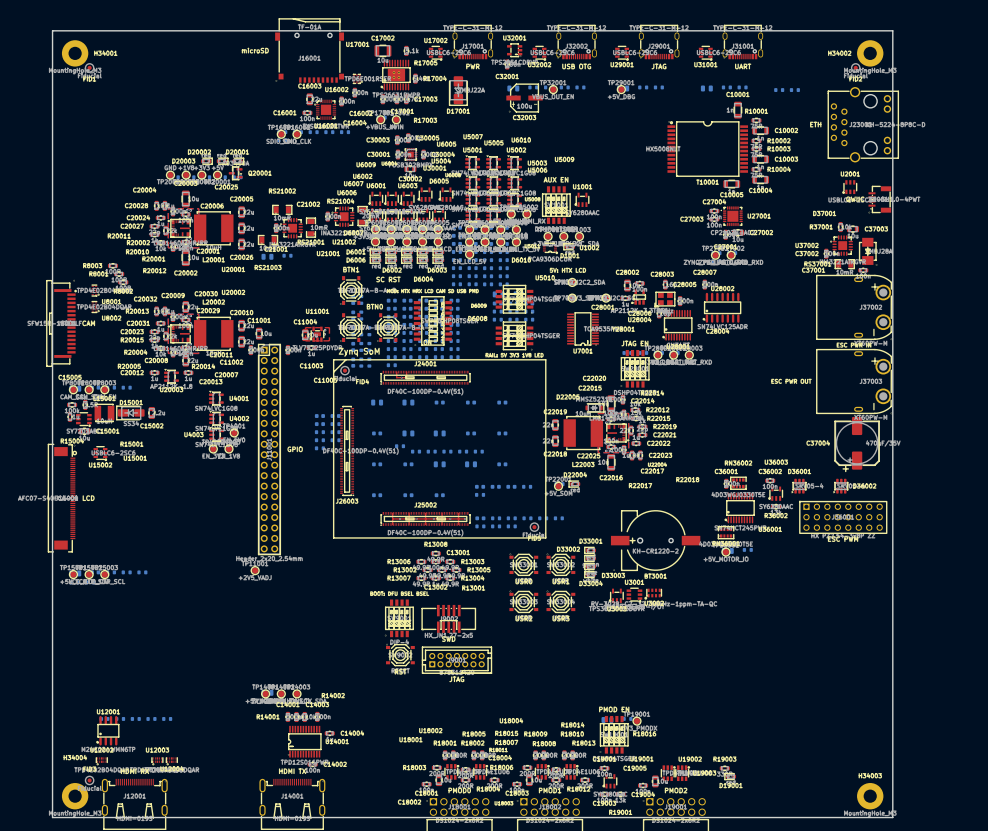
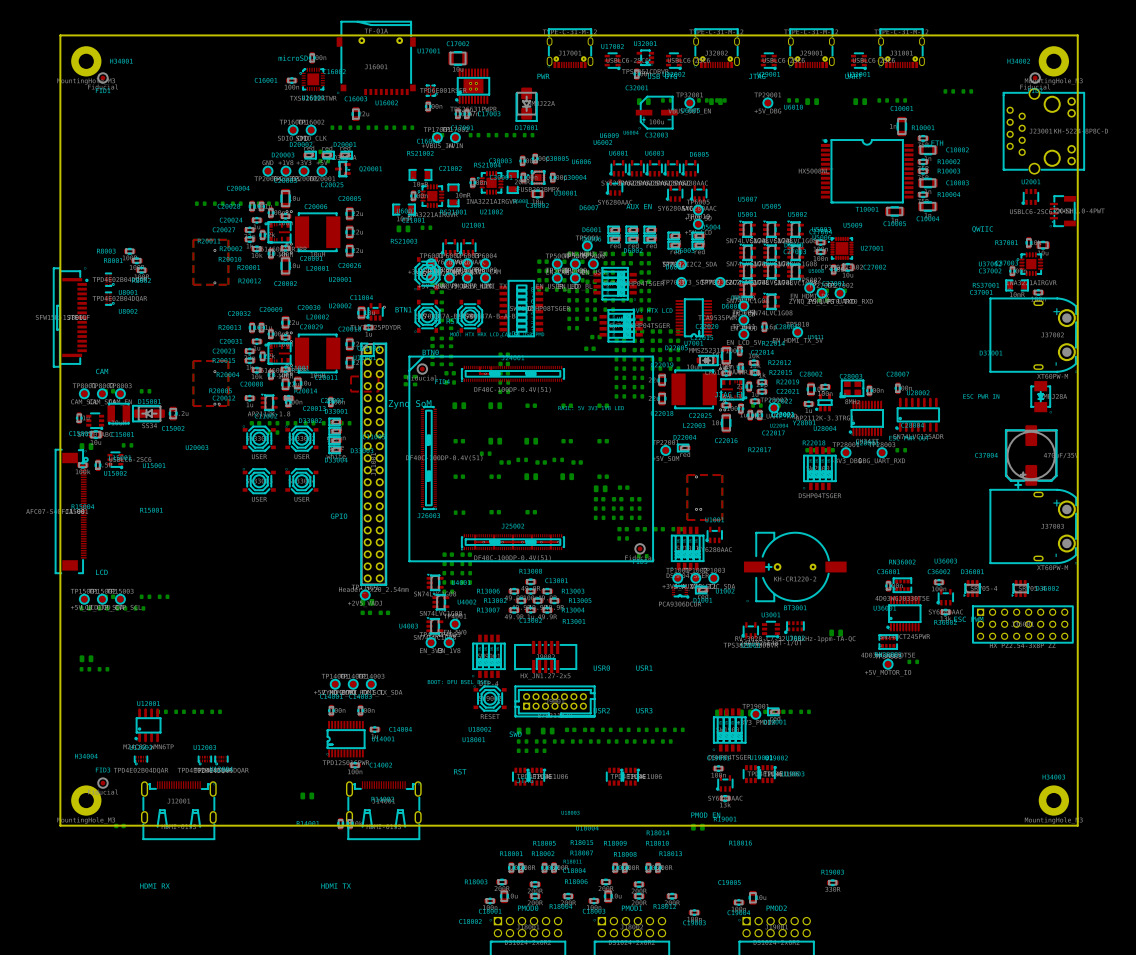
board edge: (892, 30) (892, 817) (52, 817) (52, 718) -> (1025, 35) (1077, 35) (1077, 825) (60, 825)
part position: (472, 42) -> (570, 48)
part position: (576, 42) -> (716, 48)
part position: (659, 42) -> (811, 48)
part position: (742, 42) -> (901, 48)
part position: (309, 50) -> (376, 58)
part position: (382, 50) -> (458, 58)
part side: top (406, 50) -> bottom (510, 135)
part position: (514, 50) -> (645, 57)
part position: (435, 53) -> (612, 61)
part position: (539, 53) -> (673, 61)
part position: (622, 53) -> (768, 61)
part position: (705, 53) -> (858, 61)
part position: (870, 53) -> (1053, 61)
part position: (507, 64) -> (636, 74)
part position: (855, 67) -> (1035, 78)
part position: (395, 75) -> (472, 86)
part position: (357, 78) -> (431, 90)
part side: top (415, 78) -> bottom (492, 135)
part: none -> (949, 91)
part: none -> (967, 91)
part: (533, 87) -> none
part: (549, 87) -> none
part: (564, 87) -> none
part: none -> (702, 100)
part: none -> (720, 100)
part: (643, 87) -> none
part: (658, 87) -> none
part: none -> (793, 100)
part: (726, 87) -> none
part: (742, 87) -> none
part: none -> (883, 100)
part: none -> (901, 100)
part position: (513, 88) -> (643, 101)
part: none -> (860, 101)
part position: (553, 89) -> (689, 102)
part position: (621, 89) -> (767, 102)
part: (779, 90) -> none
part: (794, 90) -> none
part position: (354, 92) -> (428, 106)
part position: (524, 98) -> (656, 112)
part position: (382, 99) -> (458, 114)
part side: top (396, 99) -> bottom (474, 135)
part position: (341, 101) -> (312, 57)
part position: (325, 109) -> (312, 79)
part position: (737, 110) -> (901, 126)
part: none -> (336, 127)
part: none -> (354, 127)
part: none -> (372, 127)
part: none -> (390, 127)
part: none -> (408, 127)
part position: (307, 112) -> (291, 80)
part: none -> (528, 135)
part position: (756, 120) -> (923, 138)
part position: (863, 124) -> (1043, 131)
part position: (760, 130) -> (927, 150)
part: (297, 132) -> none
part: (313, 132) -> none
part: (329, 132) -> none
part: (345, 132) -> none
part position: (281, 134) -> (293, 130)
part position: (297, 134) -> (311, 130)
part position: (408, 138) -> (535, 158)
part position: (397, 140) -> (522, 161)
part position: (756, 140) -> (923, 161)
part position: (707, 149) -> (867, 171)
part position: (756, 149) -> (923, 171)
part position: (398, 154) -> (523, 177)
part position: (409, 154) -> (536, 177)
part position: (423, 154) -> (552, 177)
part position: (760, 159) -> (927, 183)
part position: (206, 161) -> (309, 155)
part position: (222, 161) -> (327, 155)
part position: (238, 161) -> (345, 155)
part position: (472, 162) -> (747, 228)
part position: (493, 162) -> (771, 228)
part position: (514, 162) -> (795, 228)
part position: (410, 168) -> (537, 194)
part position: (756, 169) -> (923, 194)
part position: (235, 173) -> (342, 169)
part position: (170, 175) -> (267, 171)
part position: (186, 175) -> (285, 171)
part position: (201, 175) -> (304, 171)
part position: (217, 175) -> (322, 171)
part position: (760, 179) -> (927, 206)
part position: (472, 182) -> (747, 252)
part position: (493, 182) -> (771, 252)
part position: (514, 182) -> (795, 252)
via: none -> (287, 211)
via: none -> (291, 211)
part position: (731, 184) -> (894, 211)
part position: (849, 187) -> (1030, 196)
part position: (424, 194) -> (671, 168)
part position: (445, 194) -> (689, 168)
part: none -> (426, 227)
part position: (375, 198) -> (617, 168)
part position: (391, 198) -> (635, 168)
part position: (406, 198) -> (653, 168)
part position: (472, 198) -> (747, 270)
part position: (493, 198) -> (771, 270)
part position: (185, 199) -> (285, 198)
part: none -> (403, 228)
part position: (514, 199) -> (795, 271)
part position: (581, 199) -> (713, 534)
part position: (879, 199) -> (1062, 211)
part position: (156, 205) -> (252, 206)
part position: (164, 205) -> (261, 206)
part position: (556, 205) -> (687, 548)
part position: (282, 209) -> (420, 174)
via: (187, 210) -> none
via: (190, 210) -> none
part position: (173, 211) -> (270, 212)
part position: (241, 212) -> (349, 213)
via: none -> (287, 244)
via: none -> (291, 244)
part position: (185, 214) -> (285, 216)
part position: (472, 214) -> (747, 288)
part position: (493, 214) -> (771, 301)
part position: (526, 214) -> (809, 288)
part position: (375, 215) -> (614, 187)
part position: (422, 215) -> (674, 193)
part position: (438, 215) -> (698, 193)
part position: (327, 216) -> (472, 182)
part position: (343, 216) -> (490, 182)
part position: (362, 216) -> (512, 182)
part position: (160, 217) -> (256, 220)
via: (190, 218) -> none
via: none -> (291, 252)
part: none -> (573, 253)
part: none -> (591, 253)
part: none -> (609, 253)
part: none -> (627, 253)
part: none -> (645, 253)
part position: (154, 226) -> (249, 230)
part position: (311, 227) -> (453, 195)
part: (456, 227) -> none
part position: (840, 227) -> (1028, 242)
part position: (179, 228) -> (278, 232)
part position: (213, 228) -> (317, 232)
part position: (241, 228) -> (349, 232)
part position: (276, 228) -> (413, 196)
part position: (291, 228) -> (431, 196)
part position: (438, 229) -> (698, 210)
part position: (469, 229) -> (743, 305)
part: none -> (609, 263)
part: none -> (627, 263)
part: none -> (645, 263)
part position: (852, 229) -> (1043, 245)
part position: (165, 230) -> (262, 235)
part position: (154, 234) -> (249, 239)
part: (456, 235) -> none
part position: (548, 236) -> (677, 578)
part position: (563, 236) -> (695, 578)
part position: (579, 236) -> (713, 578)
part: none -> (591, 272)
part: none -> (609, 272)
part: none -> (645, 272)
via: (187, 238) -> none
via: (190, 238) -> none
part position: (268, 239) -> (404, 209)
part position: (438, 241) -> (698, 224)
part position: (160, 242) -> (256, 248)
part position: (185, 242) -> (285, 248)
part position: (469, 242) -> (743, 320)
part position: (516, 242) -> (797, 332)
part: (456, 243) -> none
part position: (241, 244) -> (349, 250)
part: none -> (591, 281)
part: none -> (609, 281)
part: none -> (645, 281)
part position: (841, 245) -> (1030, 264)
part position: (173, 246) -> (271, 253)
via: (190, 246) -> none
part position: (569, 246) -> (702, 589)
part position: (550, 248) -> (680, 592)
part: none -> (432, 288)
part: none -> (441, 288)
part: (456, 251) -> none
part position: (867, 251) -> (1040, 396)
part position: (375, 252) -> (614, 229)
part position: (391, 252) -> (632, 229)
part position: (407, 252) -> (650, 229)
part position: (422, 252) -> (674, 235)
part position: (438, 252) -> (698, 235)
part: (503, 252) -> none
part: none -> (573, 291)
part: none -> (591, 291)
part: none -> (645, 291)
part position: (826, 253) -> (1012, 271)
part position: (469, 254) -> (743, 334)
part: (287, 255) -> none
part: (267, 256) -> none
part position: (185, 257) -> (285, 265)
part position: (375, 260) -> (614, 239)
part position: (391, 260) -> (632, 239)
part position: (407, 260) -> (650, 239)
part position: (422, 260) -> (674, 245)
part position: (438, 260) -> (698, 245)
part: (456, 260) -> none
part: (472, 260) -> none
part: (488, 260) -> none
part: (503, 260) -> none
part: none -> (573, 300)
part: none -> (591, 300)
part: none -> (609, 300)
part: none -> (627, 300)
part: none -> (645, 300)
part position: (844, 264) -> (1017, 285)
part position: (112, 265) -> (129, 251)
part: none -> (441, 306)
via: none -> (384, 307)
part: (456, 268) -> none
part: (472, 268) -> none
part: (488, 268) -> none
part: (503, 268) -> none
part: none -> (573, 309)
part: none -> (591, 309)
part: none -> (609, 309)
part: none -> (645, 309)
part position: (863, 270) -> (1038, 292)
part position: (119, 274) -> (136, 260)
part: (456, 276) -> none
part: (472, 276) -> none
part: (488, 276) -> none
part: (503, 276) -> none
part: none -> (573, 318)
part: none -> (591, 318)
part: none -> (645, 318)
part position: (123, 282) -> (141, 270)
part: none -> (441, 324)
part: none -> (451, 324)
part position: (572, 282) -> (681, 264)
part position: (639, 283) -> (825, 386)
part: (456, 284) -> none
part: (472, 284) -> none
part: (488, 284) -> none
part: (503, 284) -> none
part position: (704, 284) -> (897, 388)
part: none -> (573, 328)
part position: (627, 285) -> (811, 389)
part: none -> (638, 331)
part: none -> (656, 331)
part: none -> (674, 331)
via: none -> (287, 332)
via: none -> (291, 332)
part position: (95, 290) -> (109, 279)
part position: (351, 290) -> (427, 273)
part: (498, 294) -> none
part: none -> (620, 340)
part: none -> (638, 340)
part: none -> (656, 340)
part: none -> (674, 340)
via: none -> (291, 341)
part position: (638, 297) -> (823, 402)
part: none -> (432, 342)
part: none -> (441, 342)
part footprint: [386, 298, 397, 303] -> [448, 336, 454, 349]
part position: (572, 298) -> (681, 282)
part position: (606, 298) -> (720, 282)
part position: (625, 298) -> (808, 404)
part: (353, 299) -> none
part: (361, 299) -> none
part position: (514, 299) -> (615, 283)
part position: (664, 299) -> (851, 388)
part: (407, 300) -> none
part: (423, 300) -> none
part: (438, 300) -> none
part: (454, 300) -> none
part position: (680, 301) -> (869, 390)
part: (497, 303) -> none
part: (529, 303) -> none
part: none -> (620, 350)
part: none -> (638, 350)
part: none -> (656, 350)
part: none -> (674, 350)
part position: (95, 307) -> (109, 298)
part position: (185, 307) -> (285, 322)
part position: (721, 307) -> (917, 414)
part position: (854, 307) -> (1033, 335)
part: (391, 308) -> none
part: (407, 308) -> none
part: (423, 308) -> none
part: (454, 308) -> none
part position: (156, 311) -> (252, 327)
part position: (164, 311) -> (261, 327)
part: (497, 311) -> none
part: (513, 311) -> none
part: (529, 311) -> none
part: none -> (620, 359)
part: none -> (638, 359)
part: none -> (656, 359)
part: none -> (674, 359)
part: none -> (432, 360)
part: none -> (441, 360)
part: none -> (451, 360)
part side: top (659, 313) -> bottom (829, 450)
via: (187, 315) -> none
via: (190, 315) -> none
part: (353, 315) -> none
part: (361, 315) -> none
part position: (173, 316) -> (270, 334)
part: (391, 316) -> none
part: (407, 316) -> none
part: (423, 316) -> none
part: (454, 316) -> none
via: none -> (287, 365)
via: none -> (291, 365)
part position: (185, 319) -> (285, 337)
part: (497, 319) -> none
part: (513, 319) -> none
part: (529, 319) -> none
part position: (432, 320) -> (521, 308)
part: none -> (620, 368)
part: none -> (638, 368)
part: none -> (656, 368)
part: none -> (674, 368)
via: none -> (720, 368)
via: none -> (724, 368)
part position: (61, 323) -> (70, 317)
part position: (160, 323) -> (256, 341)
via: (190, 323) -> none
part: (407, 324) -> none
part: (423, 324) -> none
part: (454, 324) -> none
part position: (241, 325) -> (349, 344)
via: none -> (287, 374)
via: none -> (291, 374)
via: none -> (485, 373)
part position: (677, 325) -> (866, 418)
part position: (351, 327) -> (427, 316)
part position: (388, 327) -> (470, 316)
part: none -> (620, 377)
part: none -> (638, 377)
part position: (582, 328) -> (693, 317)
via: (325, 330) -> none
part position: (154, 331) -> (249, 351)
part: (369, 331) -> none
part: (407, 332) -> none
part: (423, 332) -> none
part: (454, 332) -> none
part position: (179, 333) -> (278, 353)
part position: (213, 333) -> (317, 353)
via: (310, 334) -> none
part position: (316, 334) -> (374, 311)
via: (324, 334) -> none
part position: (305, 335) -> (361, 312)
part position: (514, 335) -> (621, 325)
part position: (165, 336) -> (262, 356)
part: none -> (620, 387)
part: none -> (638, 387)
part position: (154, 340) -> (249, 360)
part position: (241, 341) -> (349, 362)
part: (391, 341) -> none
part: (407, 341) -> none
part: (423, 341) -> none
part: (454, 341) -> none
via: (187, 344) -> none
via: (190, 344) -> none
part: none -> (620, 396)
part: none -> (638, 396)
part: (353, 346) -> none
part: (361, 346) -> none
part: (369, 346) -> none
part position: (185, 347) -> (285, 369)
part position: (311, 347) -> (368, 327)
part position: (160, 348) -> (256, 370)
part: (391, 349) -> none
part: (407, 349) -> none
part: (423, 349) -> none
part: (438, 349) -> none
part: (454, 349) -> none
via: none -> (724, 401)
part position: (173, 352) -> (271, 374)
part: (627, 352) -> none
part: (643, 352) -> none
part: none -> (459, 405)
part: none -> (495, 405)
part: none -> (531, 405)
part: none -> (567, 405)
part: none -> (603, 405)
part position: (657, 355) -> (846, 452)
part position: (689, 355) -> (882, 452)
via: none -> (720, 409)
via: none -> (724, 409)
part: (391, 357) -> none
part: (407, 357) -> none
part: (423, 357) -> none
part: (438, 357) -> none
part: (454, 357) -> none
line: (333, 359) (545, 359) (545, 537) (333, 537) (333, 359) -> (409, 356) (653, 356) (653, 561) (409, 561) (409, 356)
line: (346, 359) (333, 372) -> (423, 356) (409, 370)
part position: (185, 360) -> (285, 384)
part: (353, 362) -> none
part: (361, 362) -> none
part: (369, 362) -> none
part: (391, 365) -> none
part: none -> (255, 423)
part: none -> (273, 423)
part: none -> (291, 423)
part: none -> (309, 423)
part: none -> (327, 423)
part: none -> (345, 423)
part position: (635, 368) -> (819, 468)
part position: (344, 370) -> (422, 369)
part position: (154, 372) -> (249, 398)
part position: (188, 372) -> (288, 398)
top track: (396, 372) (396, 377) (406, 377) (406, 372) -> (479, 367) (479, 373) (491, 373) (491, 367)
part position: (171, 376) -> (269, 402)
part: none -> (273, 432)
via: (401, 377) -> none
part position: (425, 377) -> (512, 373)
part position: (854, 381) -> (1033, 526)
part: none -> (459, 441)
part: none -> (495, 441)
part: none -> (531, 441)
part: none -> (567, 441)
part: none -> (603, 441)
part position: (95, 387) -> (109, 391)
part position: (126, 387) -> (145, 391)
part position: (73, 389) -> (84, 393)
part position: (89, 389) -> (102, 393)
part position: (104, 389) -> (120, 393)
part: none -> (811, 450)
part: none -> (901, 450)
part: none -> (485, 453)
part position: (216, 398) -> (435, 582)
part position: (622, 399) -> (739, 351)
part: none -> (522, 459)
part: none -> (558, 459)
part: (377, 402) -> none
part: (408, 402) -> none
part position: (611, 403) -> (726, 355)
part position: (594, 407) -> (707, 360)
part position: (635, 409) -> (753, 362)
part position: (104, 412) -> (118, 413)
part position: (130, 412) -> (148, 413)
part position: (151, 412) -> (173, 413)
part: none -> (459, 476)
part: none -> (495, 476)
part: none -> (531, 476)
part: none -> (567, 476)
part: none -> (603, 476)
part position: (623, 414) -> (740, 367)
part position: (70, 416) -> (79, 418)
part: (319, 416) -> none
part: (335, 416) -> none
part position: (216, 418) -> (440, 601)
part position: (636, 418) -> (754, 372)
part position: (83, 419) -> (95, 421)
part position: (611, 419) -> (726, 373)
via: (606, 422) -> none
via: (609, 422) -> none
part: (319, 424) -> none
part: (335, 424) -> none
part: none -> (623, 487)
part: none -> (600, 488)
part position: (555, 425) -> (662, 380)
part position: (642, 426) -> (762, 382)
part position: (631, 430) -> (749, 386)
part position: (84, 431) -> (95, 434)
part position: (234, 432) -> (455, 624)
part: (319, 432) -> none
part: (335, 432) -> none
part: (377, 433) -> none
part: (408, 433) -> none
part: (439, 433) -> none
part position: (471, 433) -> (531, 512)
part: (502, 433) -> none
part position: (583, 433) -> (694, 389)
part position: (617, 433) -> (733, 389)
part position: (216, 434) -> (434, 625)
part: none -> (599, 499)
part: none -> (617, 499)
part: none -> (635, 499)
part position: (642, 435) -> (762, 391)
part: (319, 440) -> none
part: (335, 440) -> none
part position: (555, 441) -> (662, 398)
part: none -> (599, 508)
part: none -> (617, 508)
part: none -> (635, 508)
part position: (636, 443) -> (754, 401)
part position: (857, 444) -> (1031, 456)
part: none -> (495, 512)
part position: (611, 446) -> (726, 405)
part: (319, 448) -> none
part position: (213, 449) -> (431, 642)
part position: (228, 449) -> (449, 642)
part position: (269, 449) -> (373, 464)
part position: (623, 449) -> (740, 408)
part: none -> (599, 517)
part: none -> (617, 517)
part: none -> (635, 517)
via: (606, 450) -> none
via: (609, 450) -> none
part position: (347, 451) -> (428, 458)
part: (416, 451) -> none
part: (431, 451) -> none
part: (447, 451) -> none
part: (463, 451) -> none
part: (478, 451) -> none
part position: (100, 453) -> (115, 460)
part position: (632, 455) -> (750, 415)
part position: (640, 455) -> (759, 415)
part: none -> (623, 529)
part: none -> (641, 529)
part: none -> (659, 529)
part: none -> (677, 529)
part position: (611, 462) -> (726, 423)
part: (377, 464) -> none
part: (408, 464) -> none
part: (439, 464) -> none
part: (471, 464) -> none
part: (502, 464) -> none
part: none -> (623, 538)
via: none -> (483, 542)
via: none -> (502, 542)
via: none -> (522, 542)
via: none -> (541, 542)
via: none -> (558, 542)
part position: (770, 480) -> (939, 582)
part: none -> (448, 554)
part: none -> (466, 554)
part position: (726, 483) -> (888, 585)
part position: (738, 483) -> (902, 585)
part position: (574, 484) -> (684, 447)
part: (480, 486) -> none
part: (495, 486) -> none
part: (511, 486) -> none
part: (527, 486) -> none
part position: (558, 486) -> (665, 450)
part position: (798, 486) -> (971, 588)
part position: (840, 486) -> (1020, 588)
part: none -> (448, 563)
part: none -> (466, 563)
part position: (775, 493) -> (945, 597)
part: (480, 494) -> none
part: (377, 495) -> none
part: (408, 495) -> none
part: (439, 495) -> none
part position: (62, 498) -> (71, 511)
part: none -> (448, 573)
part: none -> (466, 573)
part: none -> (448, 582)
part: none -> (466, 582)
part position: (776, 506) -> (945, 612)
part position: (739, 508) -> (903, 613)
top track: (392, 513) (392, 524) -> (475, 535) (475, 548)
top track: (409, 513) (409, 524) -> (494, 535) (494, 548)
top track: (425, 513) (425, 524) -> (512, 535) (512, 548)
top track: (442, 513) (442, 524) -> (531, 535) (531, 548)
top track: (458, 513) (458, 524) -> (550, 535) (550, 548)
part: none -> (448, 591)
part position: (843, 517) -> (1022, 624)
top track: (392, 518) (465, 518) -> (475, 542) (558, 542)
via: (400, 518) -> none
via: (416, 518) -> none
part position: (425, 518) -> (512, 542)
via: (433, 518) -> none
via: (450, 518) -> none
via: (465, 518) -> none
part: (480, 518) -> none
part: (496, 518) -> none
part: (511, 518) -> none
part: (527, 518) -> none
part: (543, 518) -> none
part: (558, 518) -> none
part: none -> (145, 596)
part: none -> (163, 596)
part: none -> (367, 602)
part: (480, 526) -> none
part: (496, 526) -> none
part: (511, 526) -> none
part position: (534, 527) -> (640, 548)
part: none -> (85, 608)
part: none -> (103, 608)
part: none -> (121, 608)
part: none -> (139, 608)
part position: (726, 532) -> (888, 642)
part: none -> (366, 612)
part: none -> (384, 612)
part position: (655, 540) -> (795, 566)
part: (747, 549) -> none
part position: (590, 550) -> (335, 421)
part position: (725, 552) -> (888, 664)
part position: (435, 553) -> (530, 581)
part position: (590, 558) -> (335, 431)
part position: (421, 561) -> (514, 591)
part position: (435, 561) -> (530, 591)
part position: (450, 561) -> (547, 591)
part position: (523, 564) -> (259, 438)
part position: (560, 564) -> (301, 438)
part position: (590, 566) -> (335, 440)
part position: (255, 570) -> (365, 595)
part position: (427, 570) -> (521, 600)
part position: (442, 570) -> (537, 600)
part position: (456, 570) -> (554, 600)
part position: (95, 572) -> (109, 596)
part: (110, 572) -> none
part: (126, 572) -> none
part: (142, 572) -> none
part position: (73, 574) -> (84, 599)
part position: (89, 574) -> (102, 599)
part position: (104, 574) -> (120, 599)
part position: (590, 574) -> (335, 449)
part: none -> (913, 661)
part position: (421, 578) -> (514, 610)
part position: (435, 578) -> (530, 610)
part position: (450, 578) -> (547, 610)
part position: (653, 593) -> (794, 627)
part position: (616, 595) -> (750, 630)
part position: (634, 595) -> (770, 629)
part position: (523, 601) -> (259, 481)
part position: (560, 601) -> (301, 481)
part position: (399, 618) -> (488, 656)
part position: (448, 618) -> (545, 656)
part: none -> (162, 711)
part: none -> (180, 711)
part: none -> (198, 711)
part: none -> (216, 711)
part: none -> (768, 711)
part: none -> (787, 711)
part: none -> (805, 711)
part: none -> (721, 713)
part: none -> (746, 713)
part: none -> (570, 729)
part: none -> (588, 729)
part: none -> (606, 729)
part: none -> (624, 729)
part: none -> (642, 729)
part: none -> (660, 729)
part: none -> (678, 729)
part: none -> (523, 731)
part: none -> (547, 731)
part: none -> (522, 741)
part: none -> (540, 741)
part: none -> (558, 741)
part: none -> (576, 741)
part: none -> (594, 741)
part: none -> (612, 741)
part: none -> (630, 741)
part: none -> (648, 741)
part: none -> (666, 741)
part: none -> (522, 750)
part: none -> (540, 750)
part position: (400, 655) -> (490, 698)
part position: (456, 660) -> (554, 701)
part position: (265, 693) -> (335, 684)
part position: (281, 693) -> (353, 684)
part position: (297, 693) -> (371, 684)
part position: (287, 716) -> (331, 710)
part position: (317, 716) -> (360, 710)
part: (120, 718) -> none
part: (135, 718) -> none
part: (151, 718) -> none
part: (167, 718) -> none
part: (627, 718) -> none
part position: (637, 721) -> (755, 714)
part position: (107, 730) -> (147, 725)
part position: (329, 733) -> (374, 729)
part position: (614, 734) -> (729, 730)
part position: (304, 741) -> (346, 739)
part position: (101, 761) -> (141, 760)
part position: (157, 761) -> (204, 760)
part position: (171, 761) -> (221, 760)
part position: (312, 764) -> (355, 765)
part position: (604, 768) -> (718, 768)
part position: (451, 771) -> (520, 776)
part position: (480, 771) -> (537, 776)
part position: (542, 771) -> (614, 776)
part position: (571, 771) -> (631, 776)
part position: (668, 773) -> (751, 774)
part position: (682, 773) -> (768, 774)
part position: (730, 776) -> (774, 711)
part position: (89, 780) -> (102, 783)
part position: (609, 781) -> (724, 783)
part position: (620, 794) -> (725, 798)
part position: (75, 796) -> (86, 800)
part position: (870, 796) -> (1053, 800)
part position: (134, 804) -> (178, 810)
part position: (292, 804) -> (383, 810)

